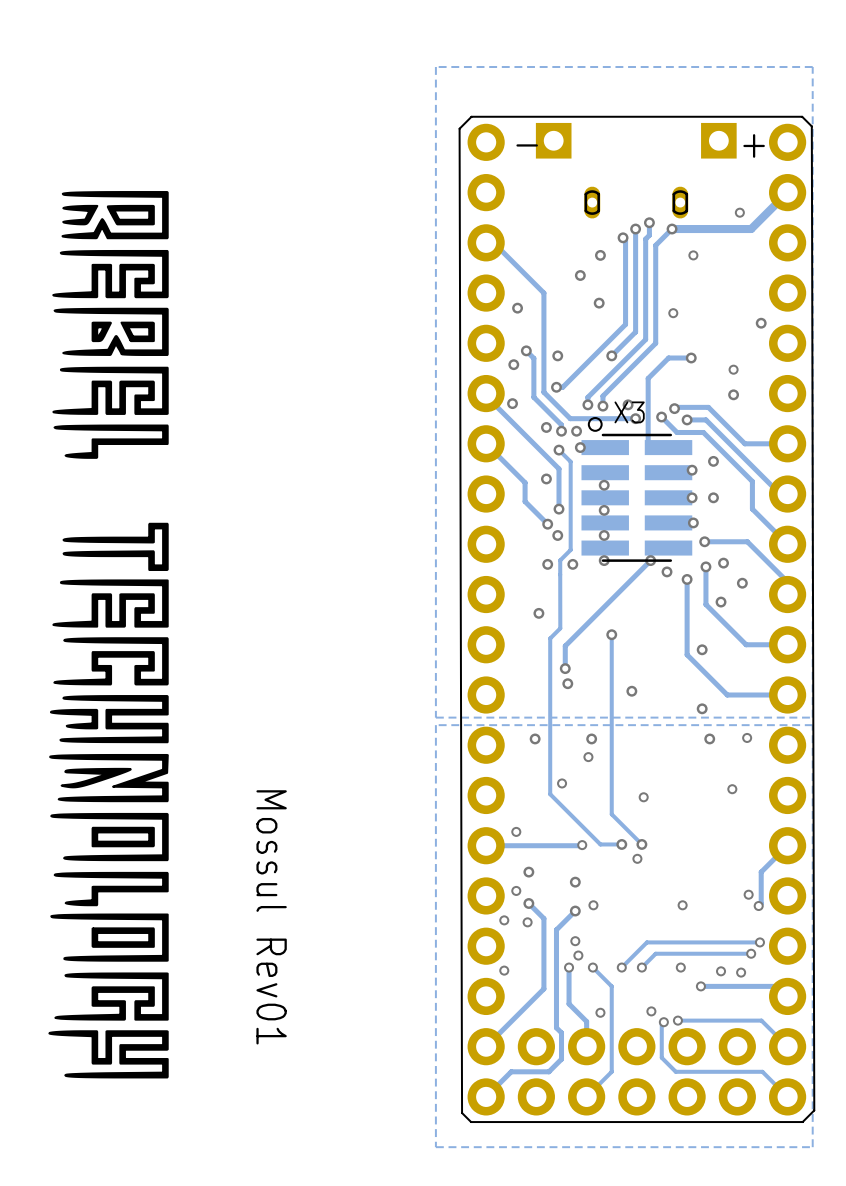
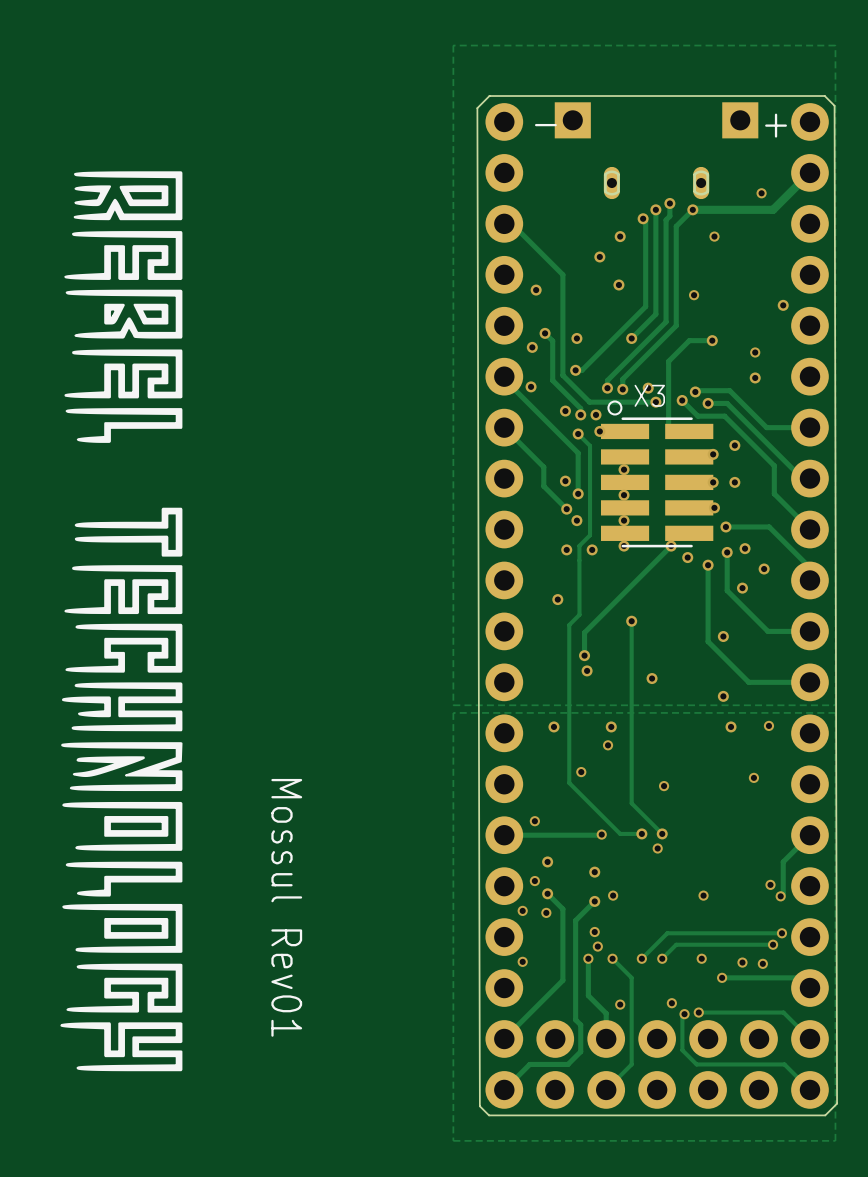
via position: (546, 478) -> (565, 481)

